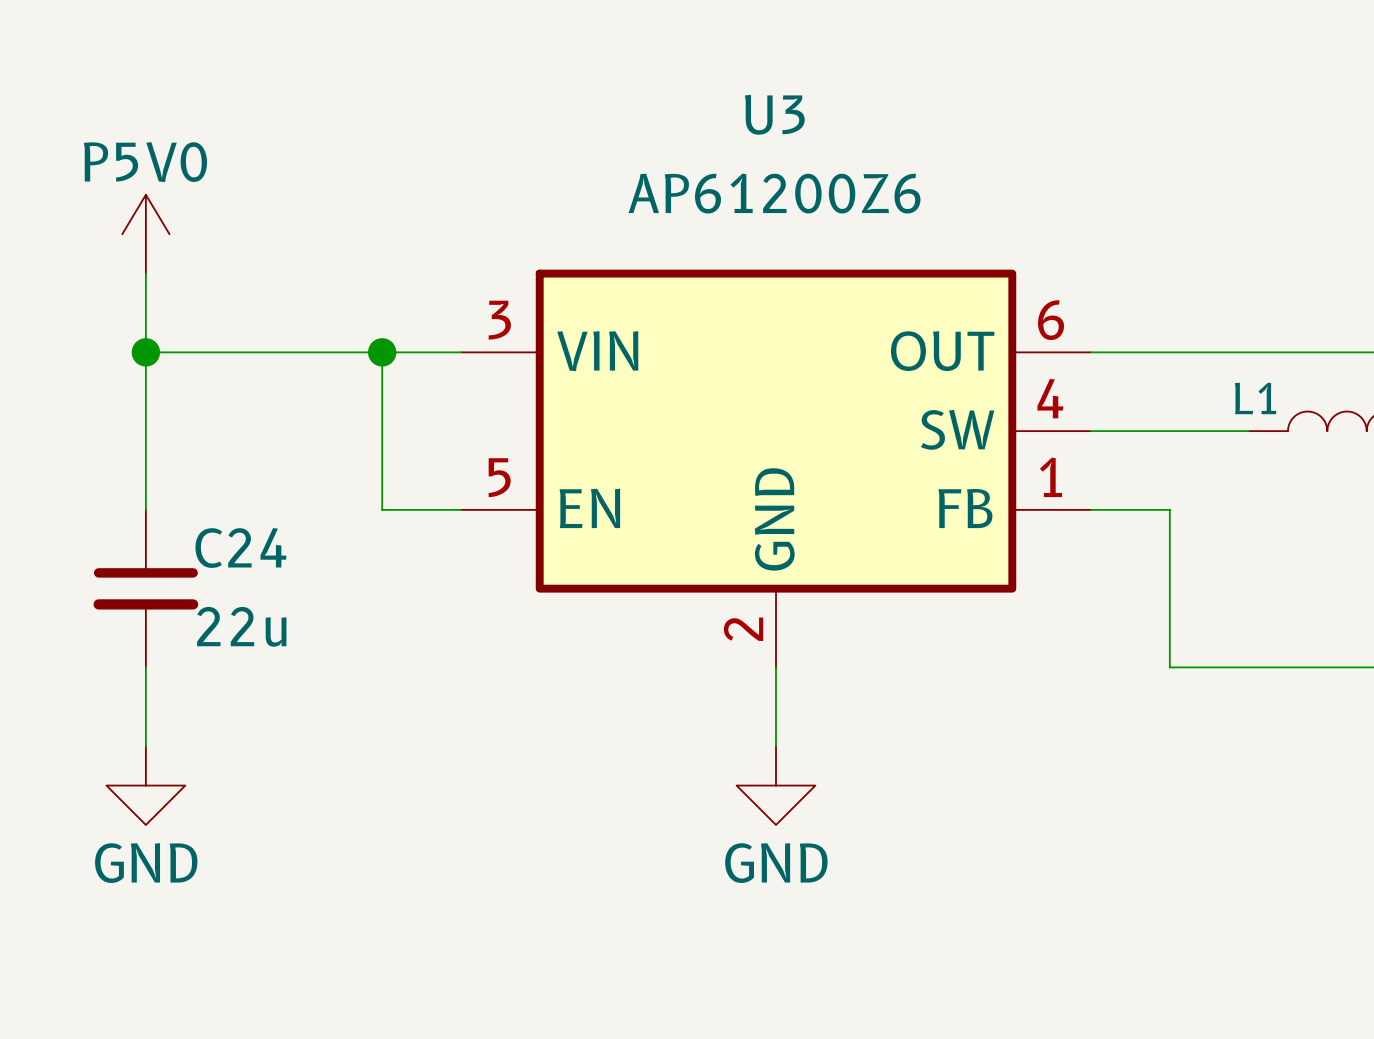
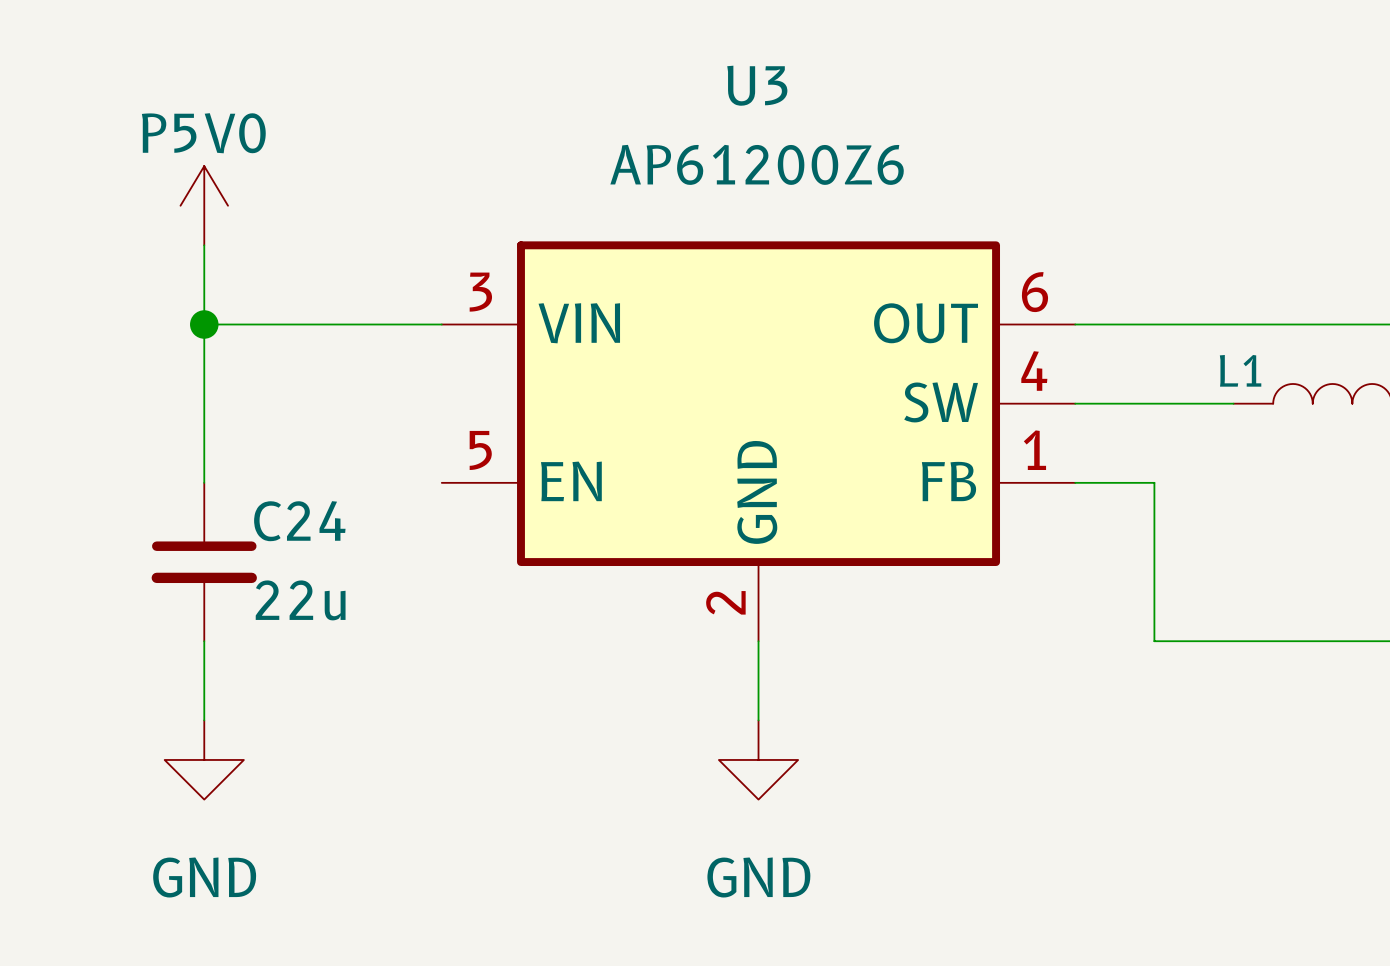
power symbol position: P5V0 (145, 234) -> P5V0 (204, 205)
wire: (145, 273) (145, 509) -> (204, 245) (204, 482)
wire: (145, 352) (224, 352) -> none
junction: (145, 352) -> none
junction: none -> (204, 324)
wire: (382, 352) (382, 509) (460, 509) -> none
junction: (382, 352) -> none
C24 position: (145, 588) -> (204, 562)
wire: (145, 667) (145, 746) -> (204, 641) (204, 720)
power symbol position: GND (145, 785) -> GND (204, 759)
power symbol text position: GND (146, 863) -> GND (204, 877)
power symbol text position: GND (776, 863) -> GND (758, 877)

